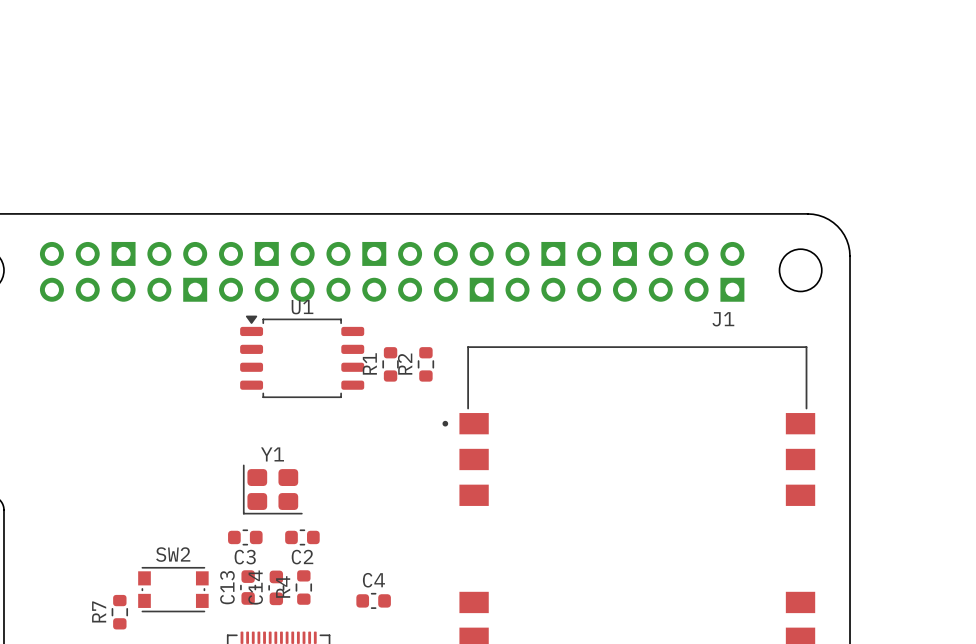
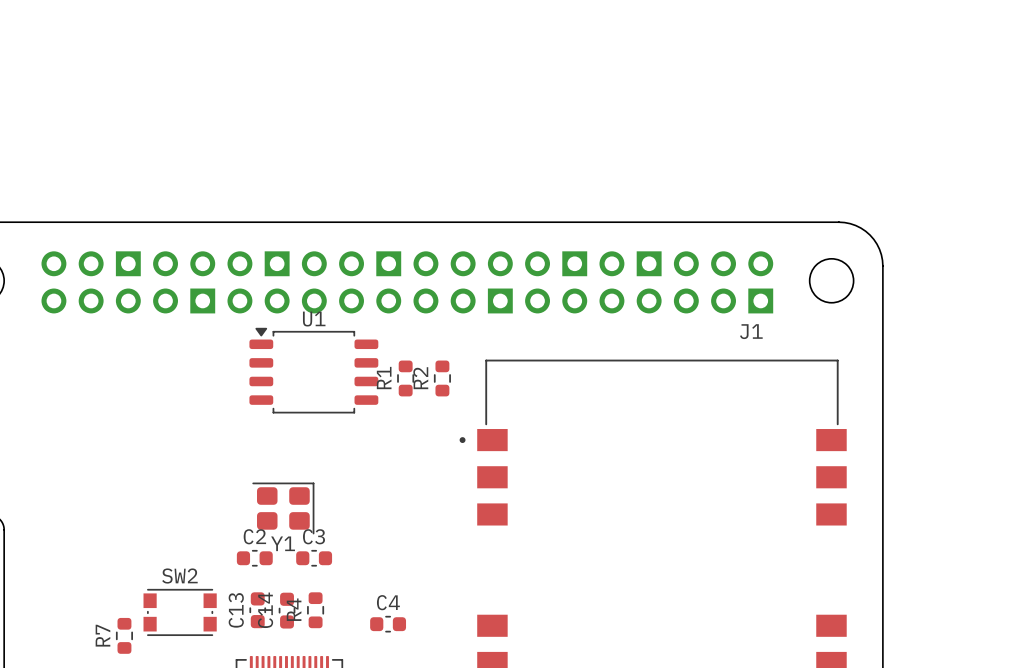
Y1 rotation: 0° (272, 489) -> 180° (283, 508)
C3 name: C3 (245, 557) -> C2 (254, 536)
C2 name: C2 (302, 557) -> C3 (314, 536)

